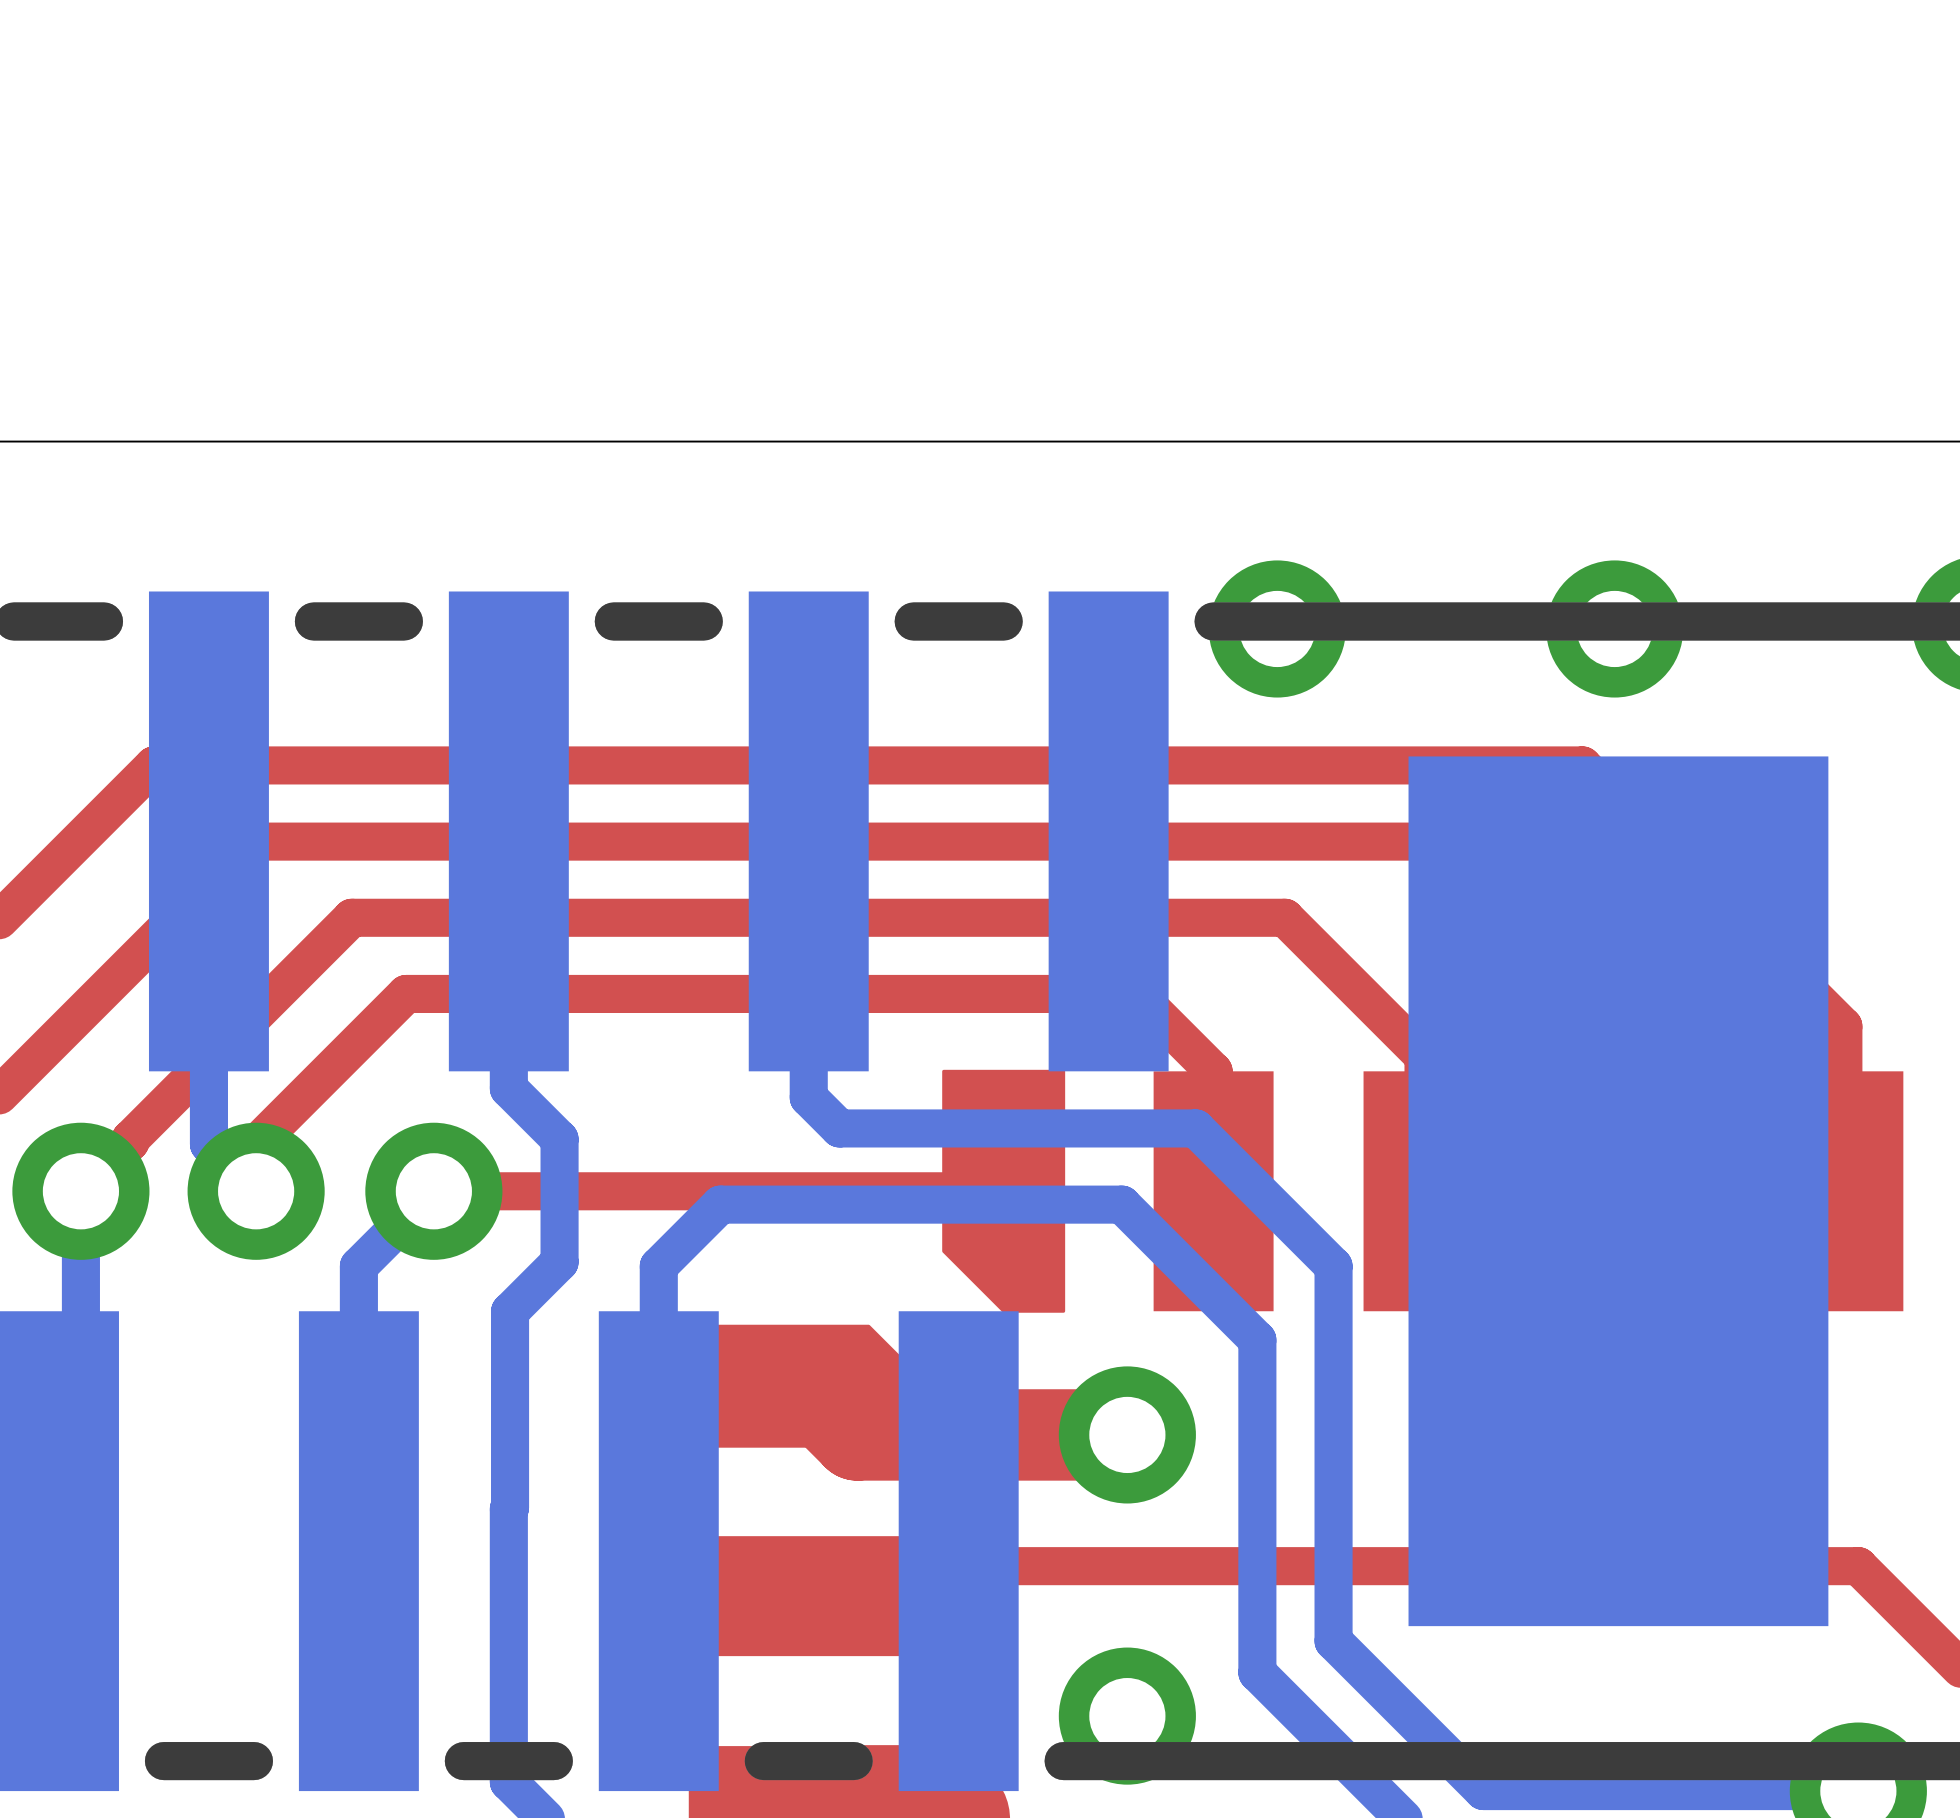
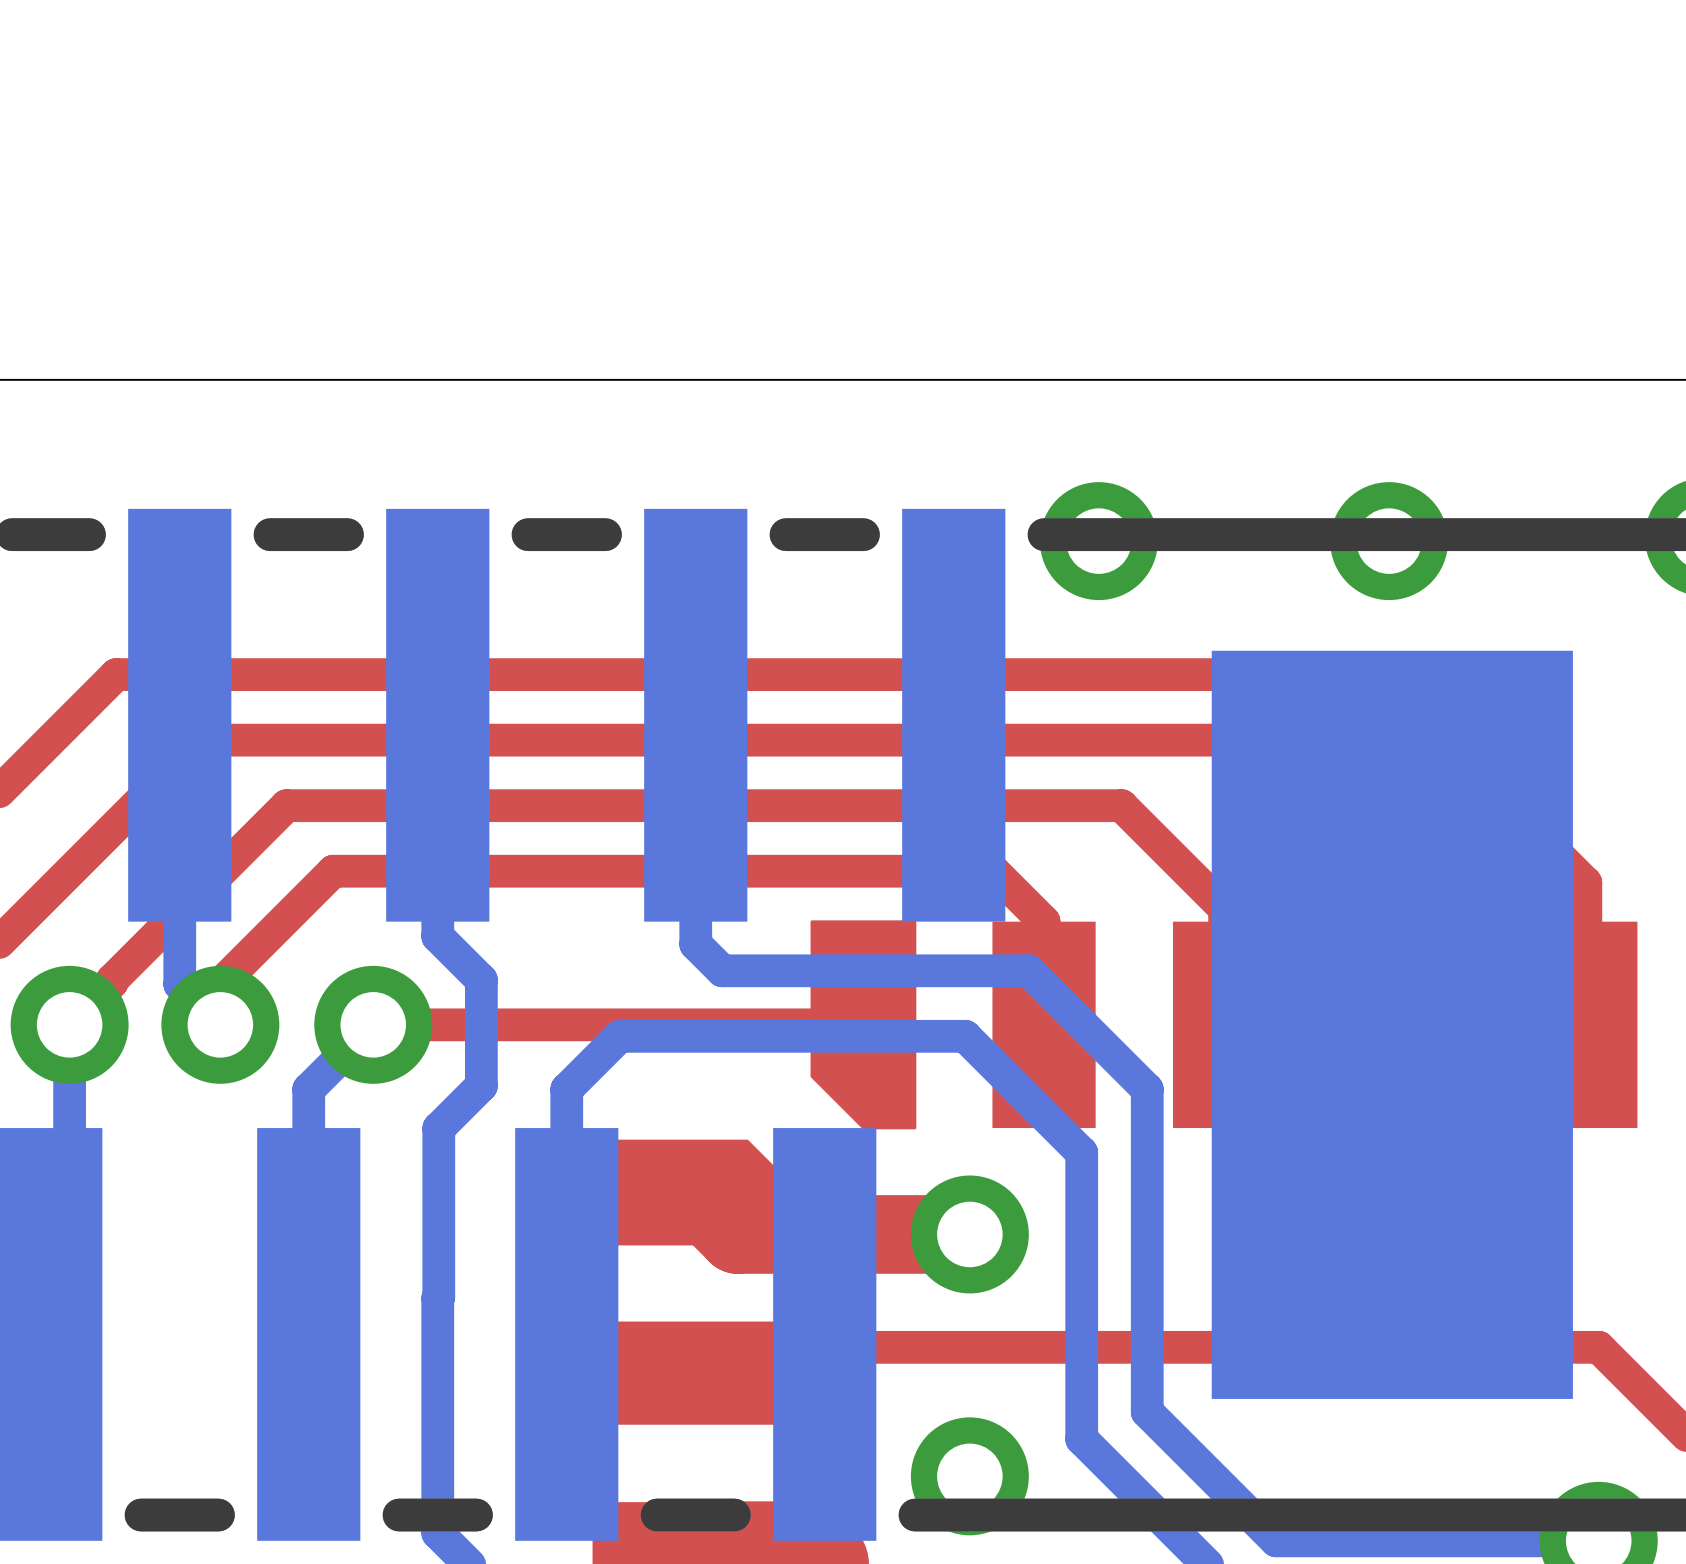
top track: (1601, 784) (1582, 765) (153, 765) (135, 784) -> (1377, 674) (116, 674)
top track: (1452, 860) (1433, 841) (252, 841) (234, 860) -> (1249, 740) (201, 740)
top track: (1303, 936) (1284, 917) (351, 917) (333, 936) -> (1121, 805) (286, 805)
top track: (1154, 1012) (1136, 993) (406, 993) (387, 1012) -> (993, 871) (333, 871)

